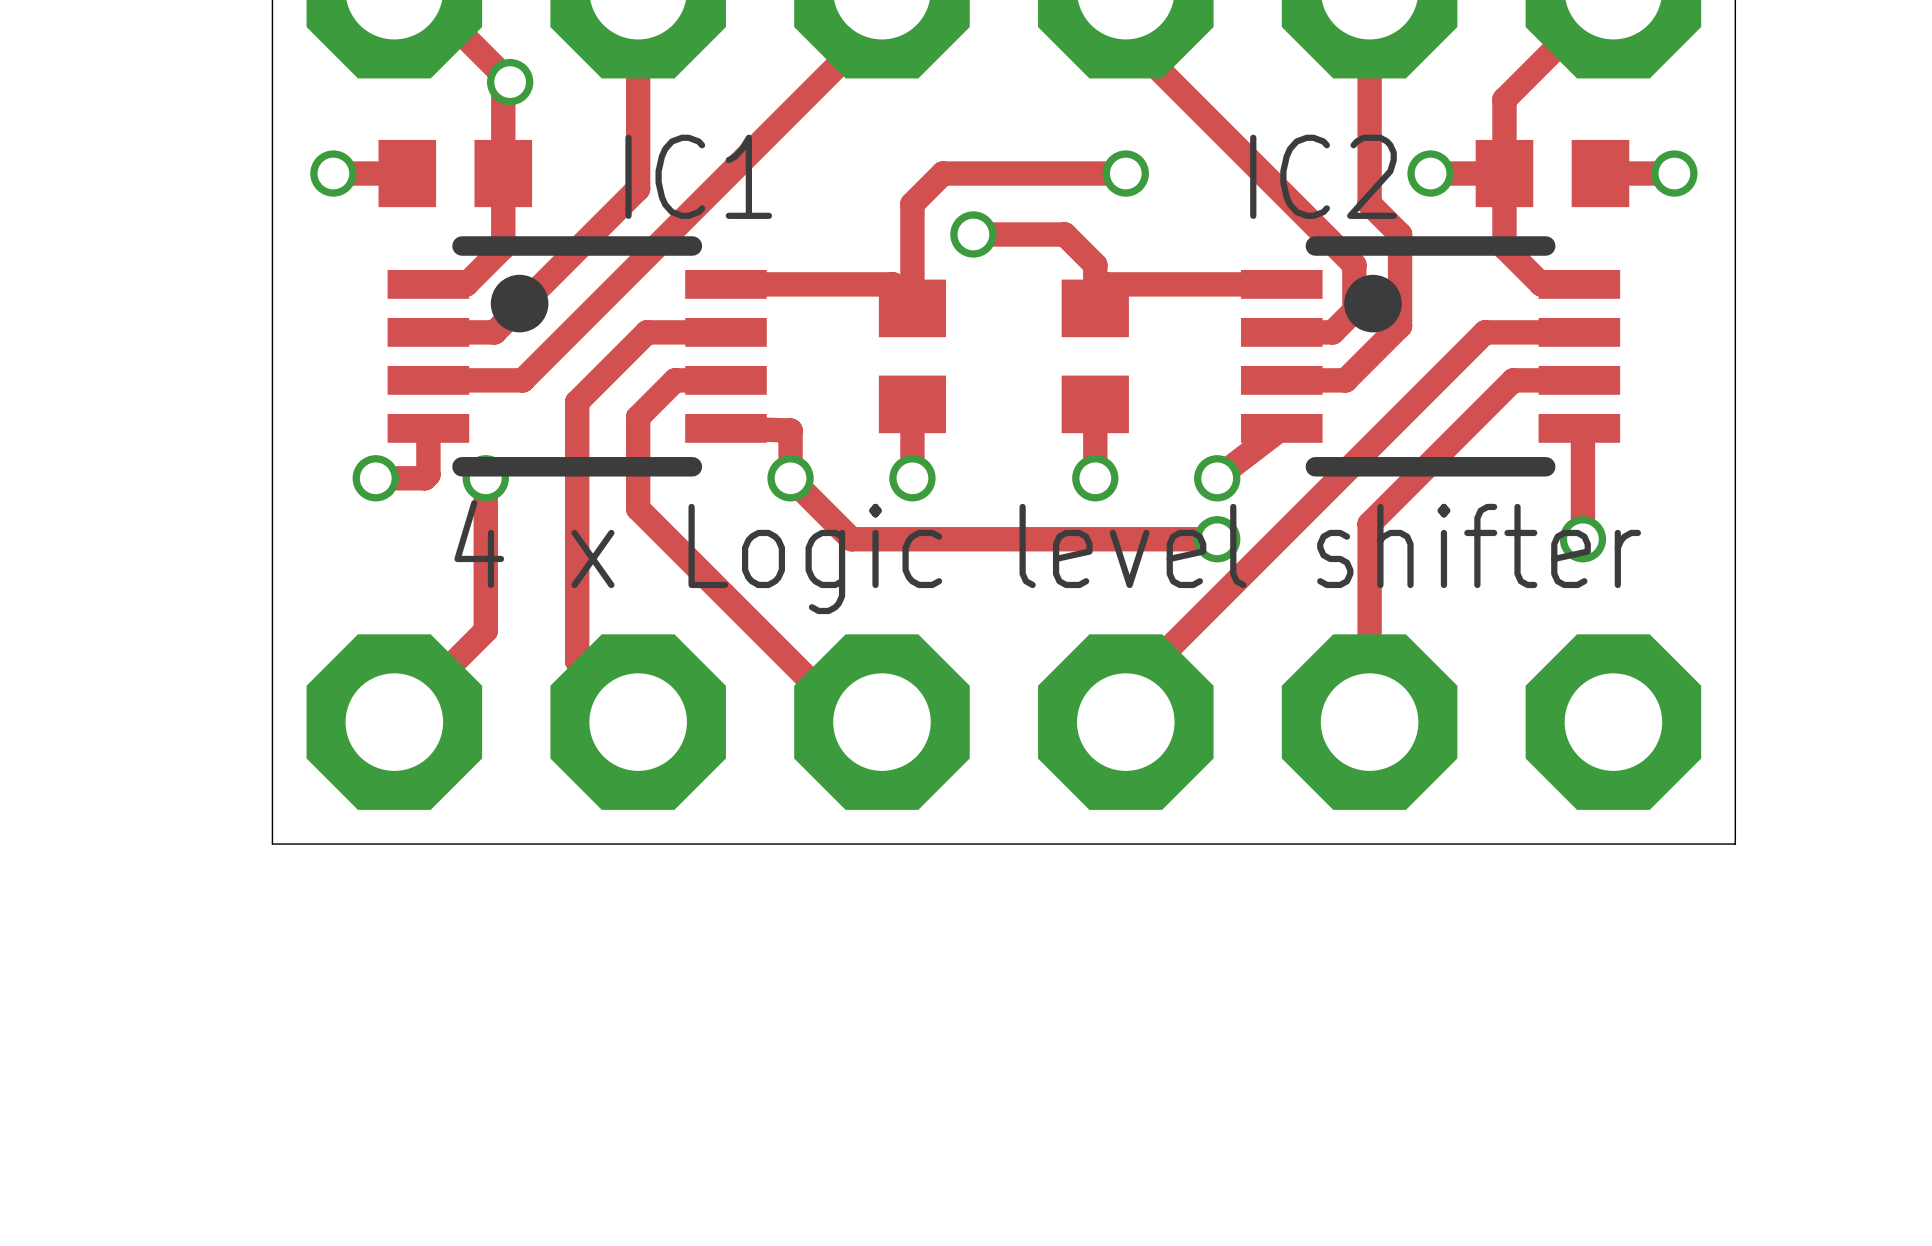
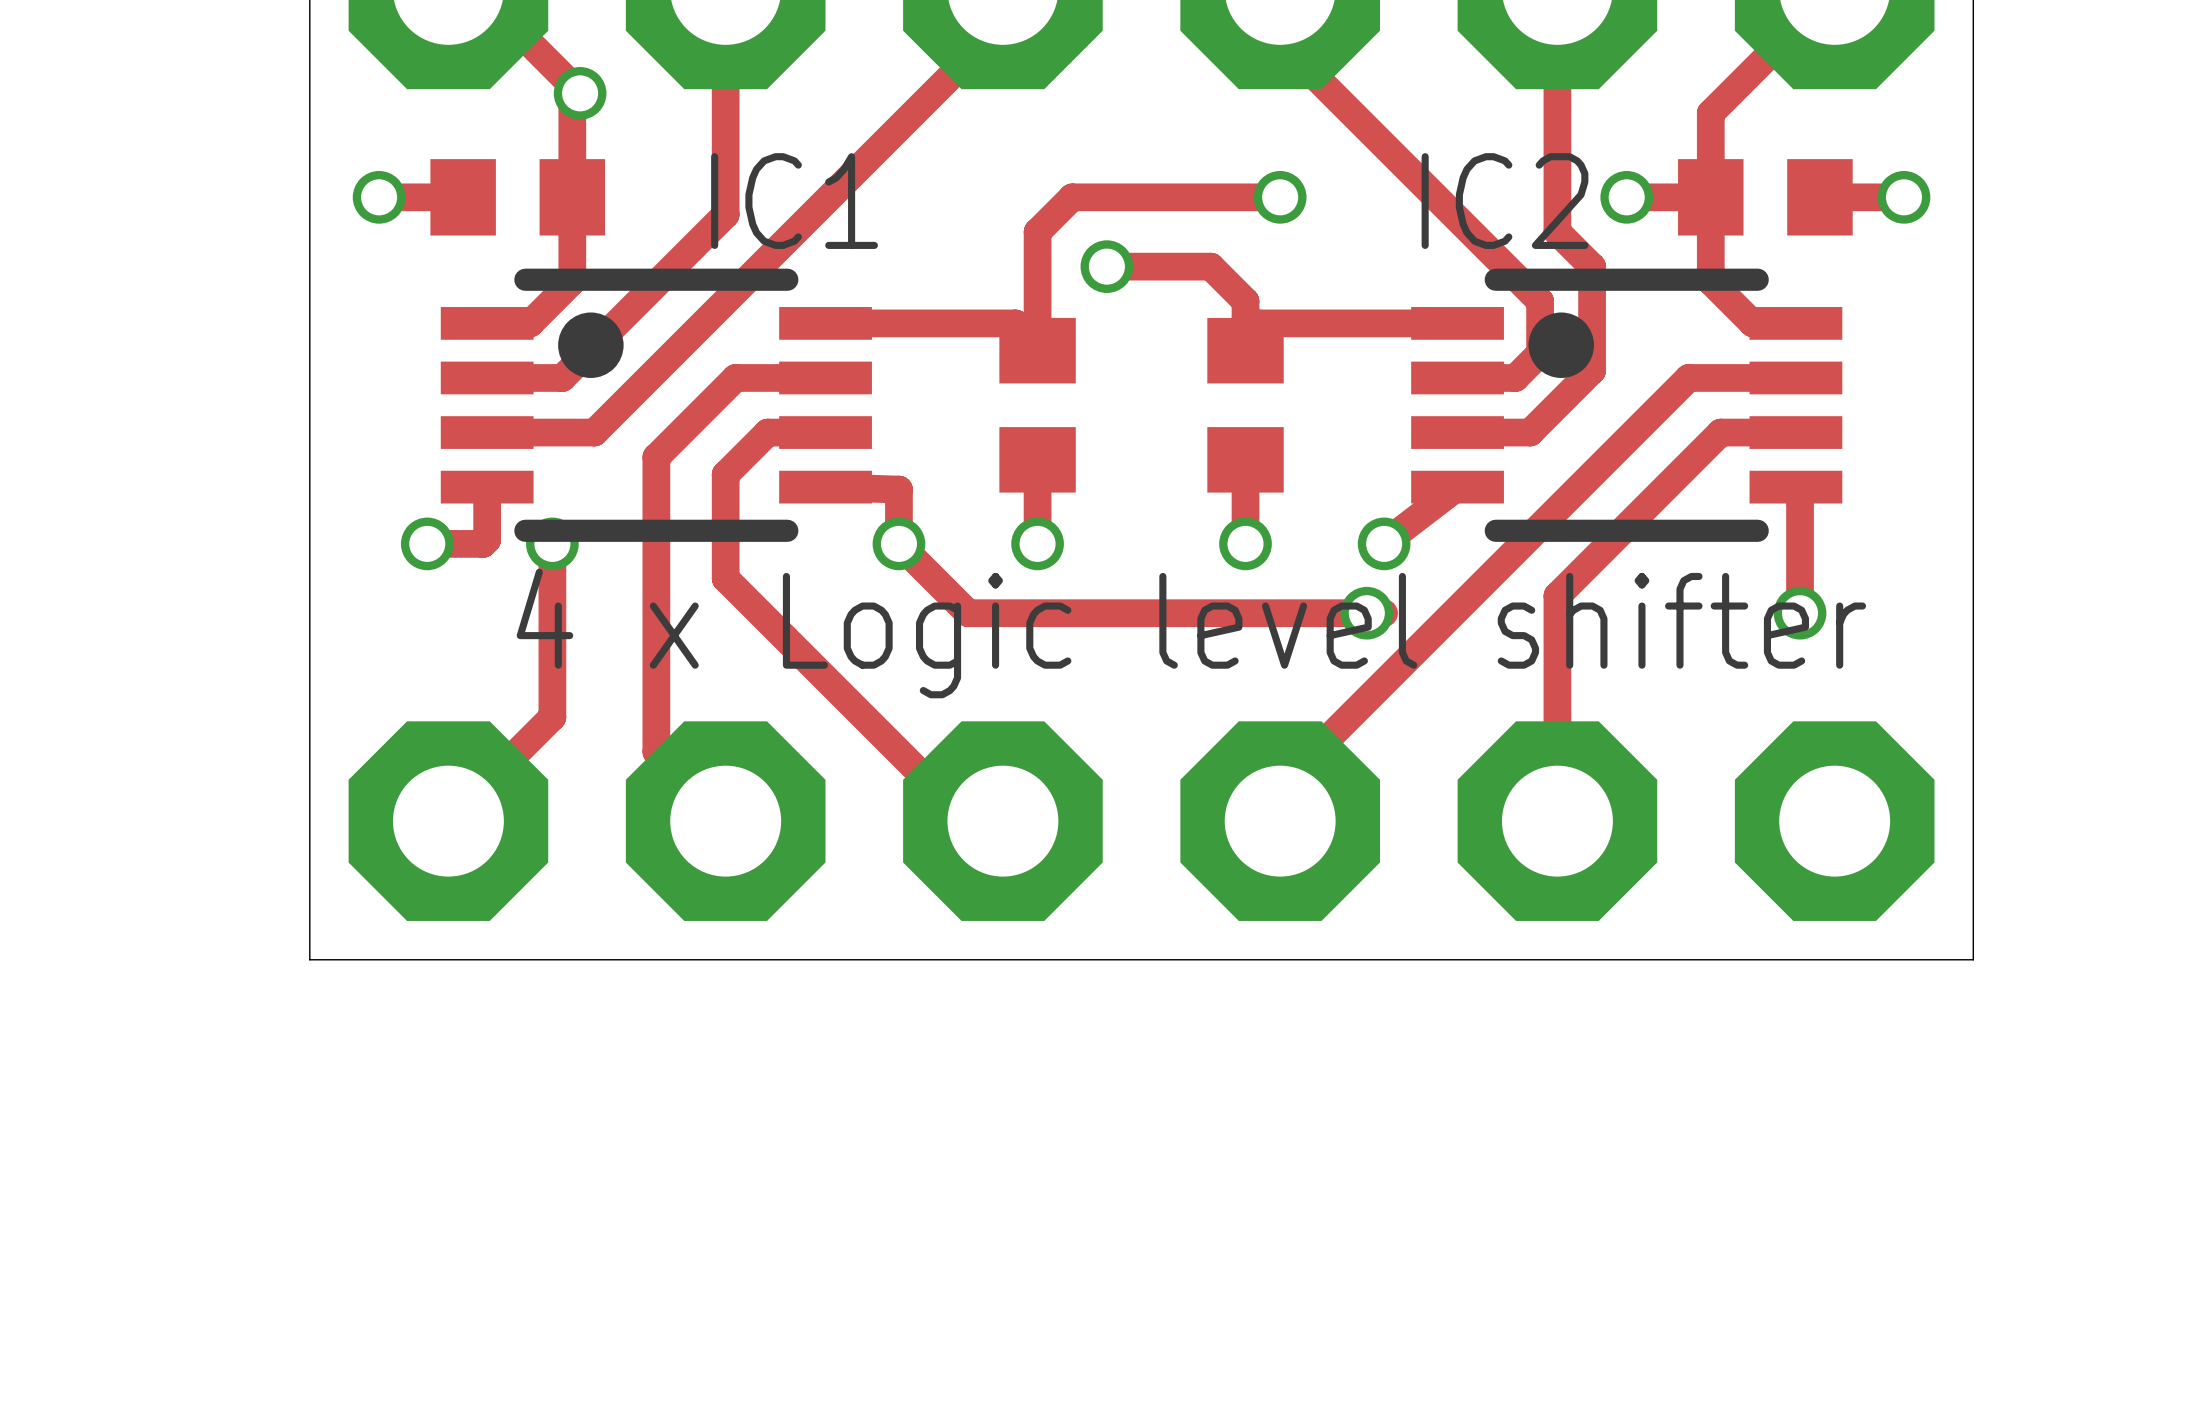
via position: (1217, 539) -> (1366, 613)

